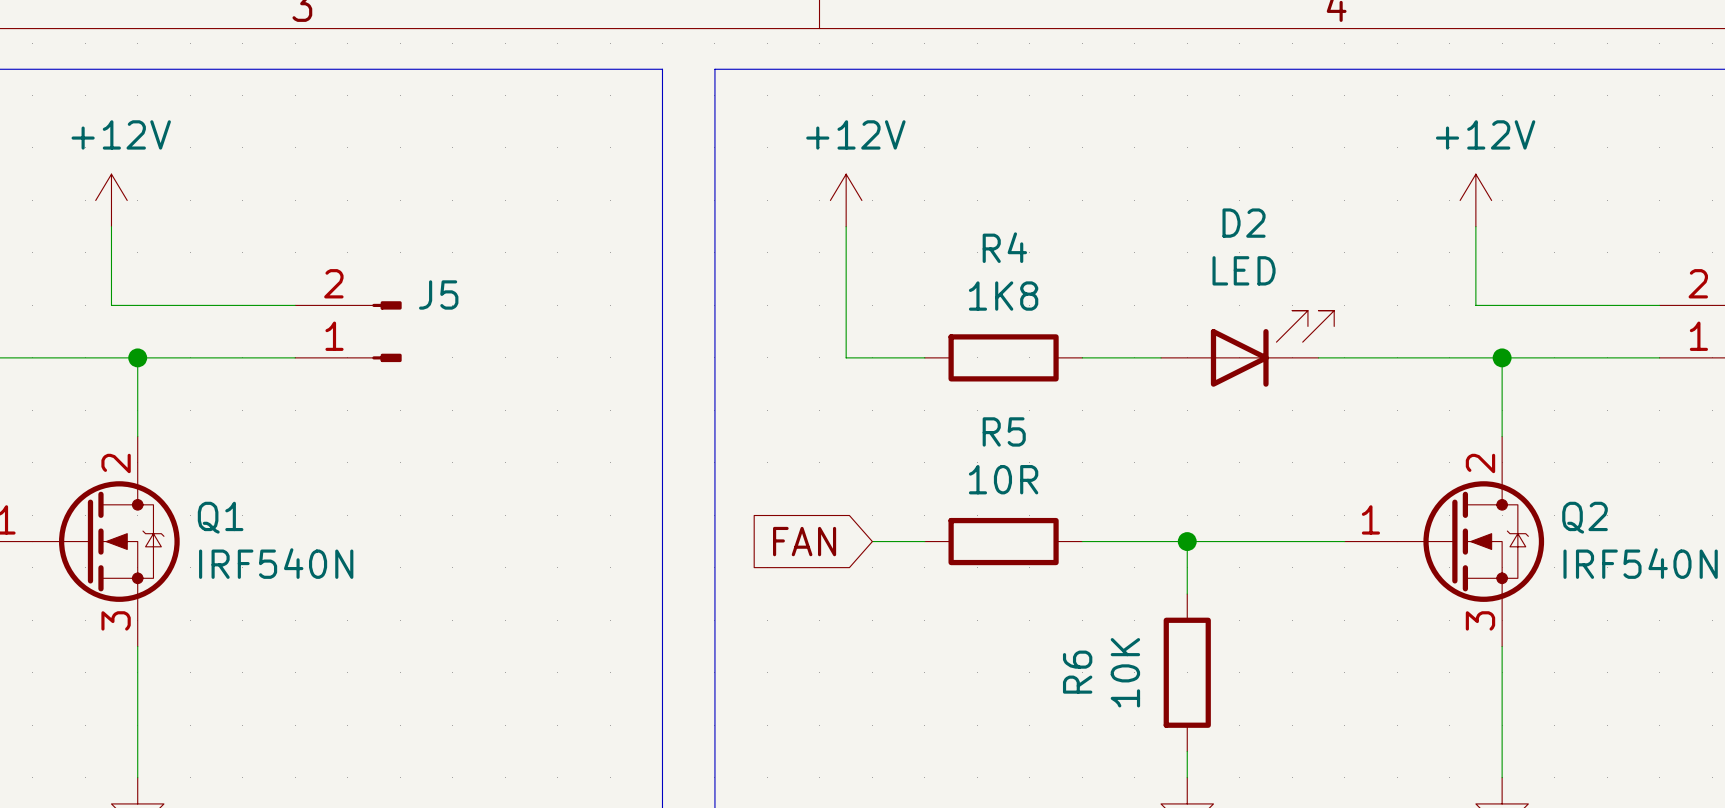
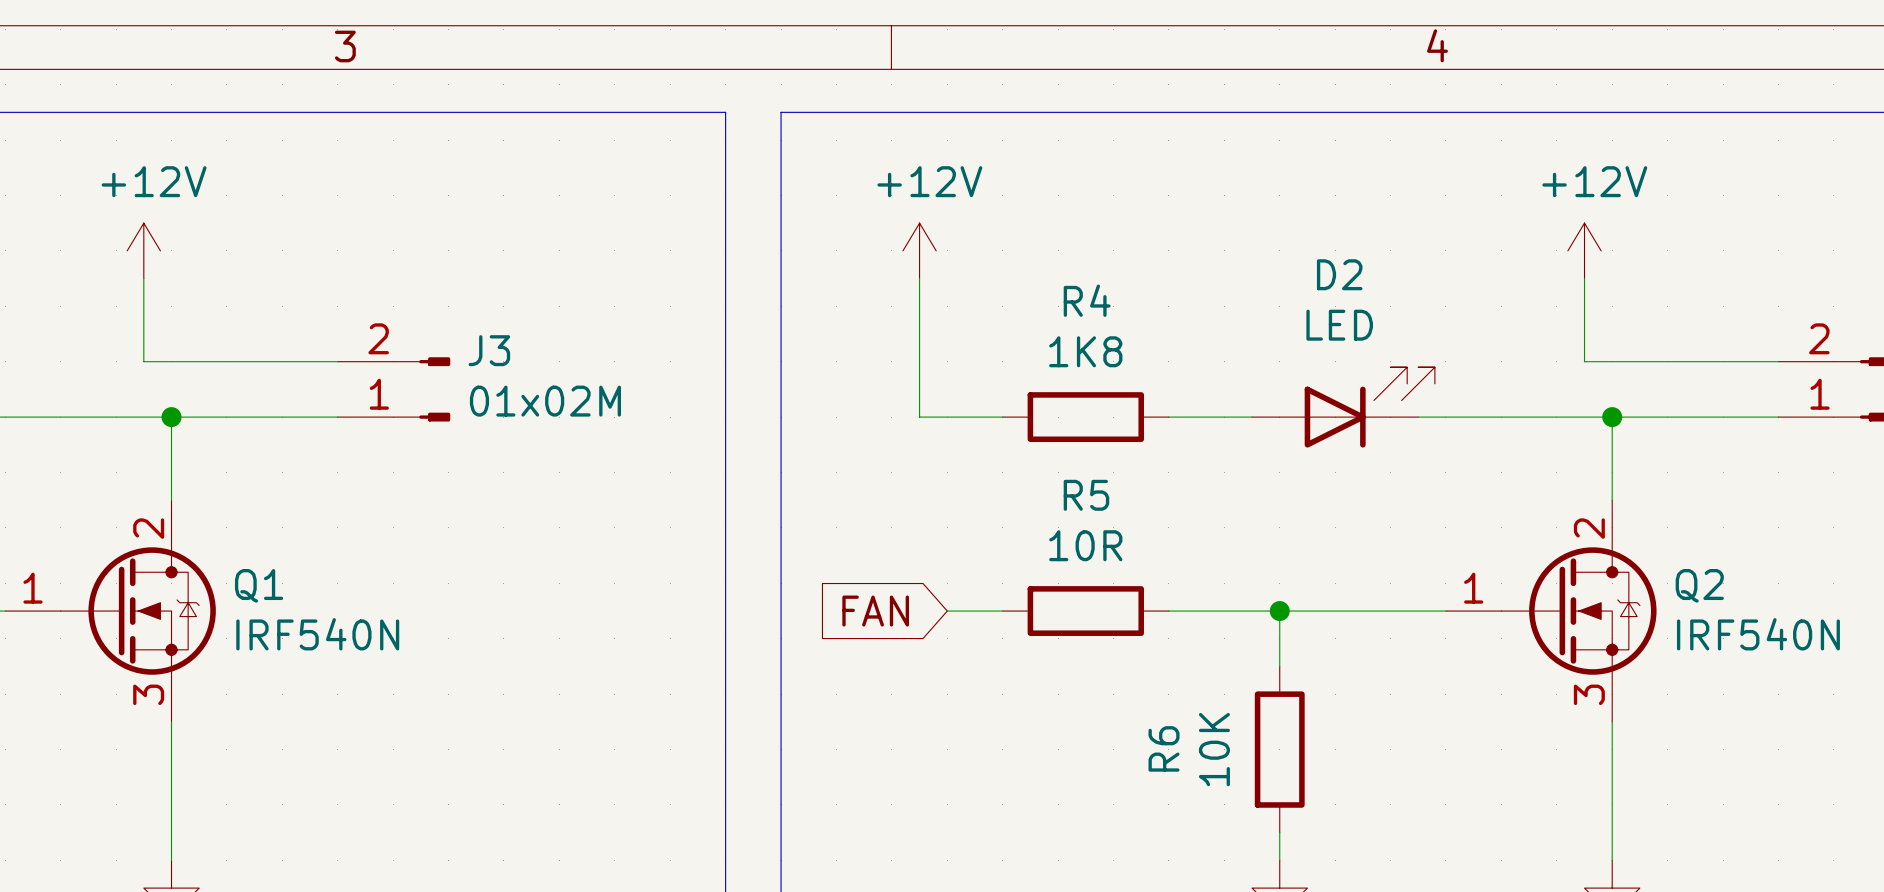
J5 name: J5 (438, 294) -> J3 (489, 350)
J5 value: none -> 01x02M (545, 401)

